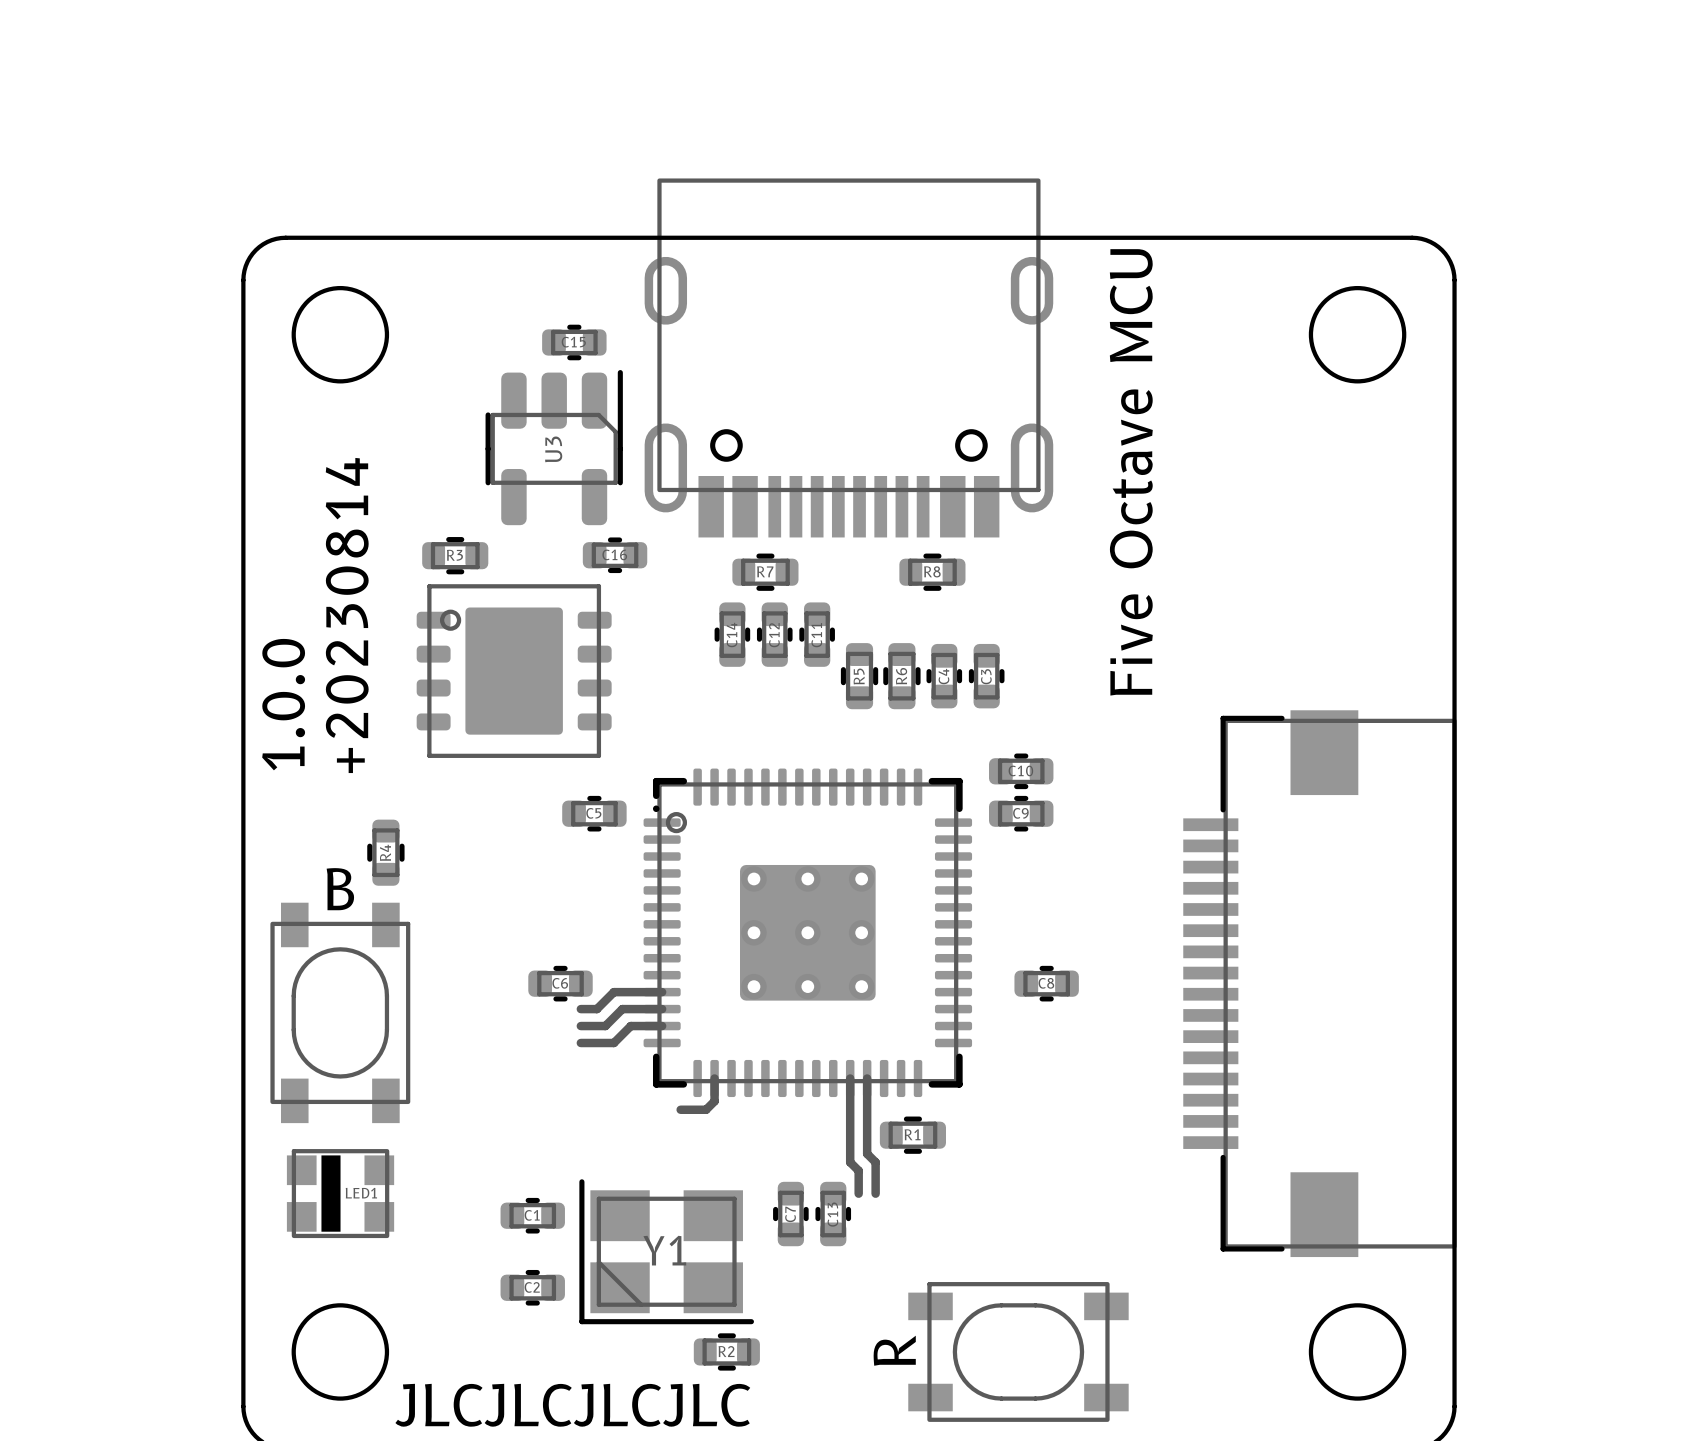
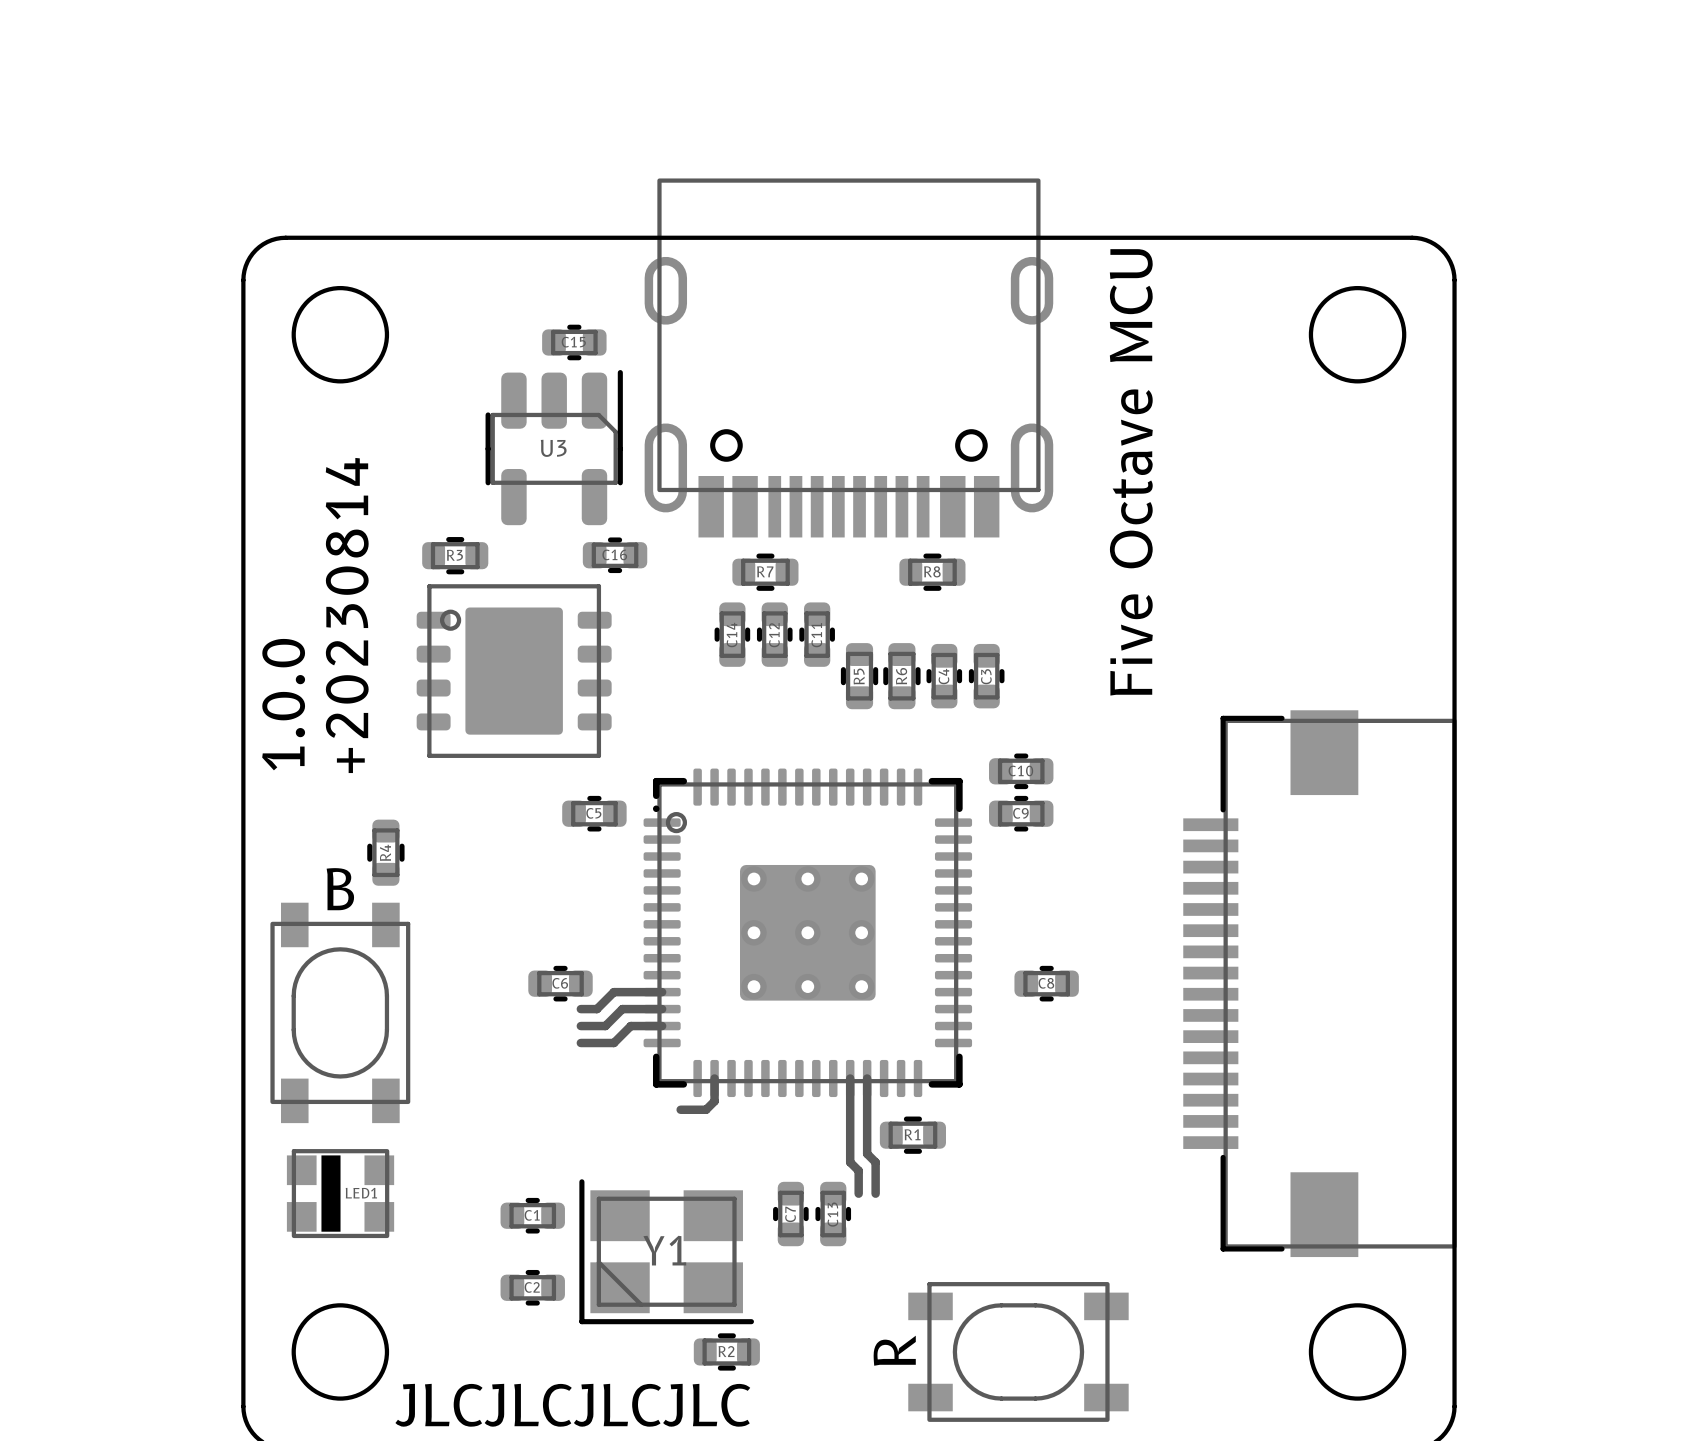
U3 name rotation: 0° (553, 449) -> 90° clockwise (553, 448)

